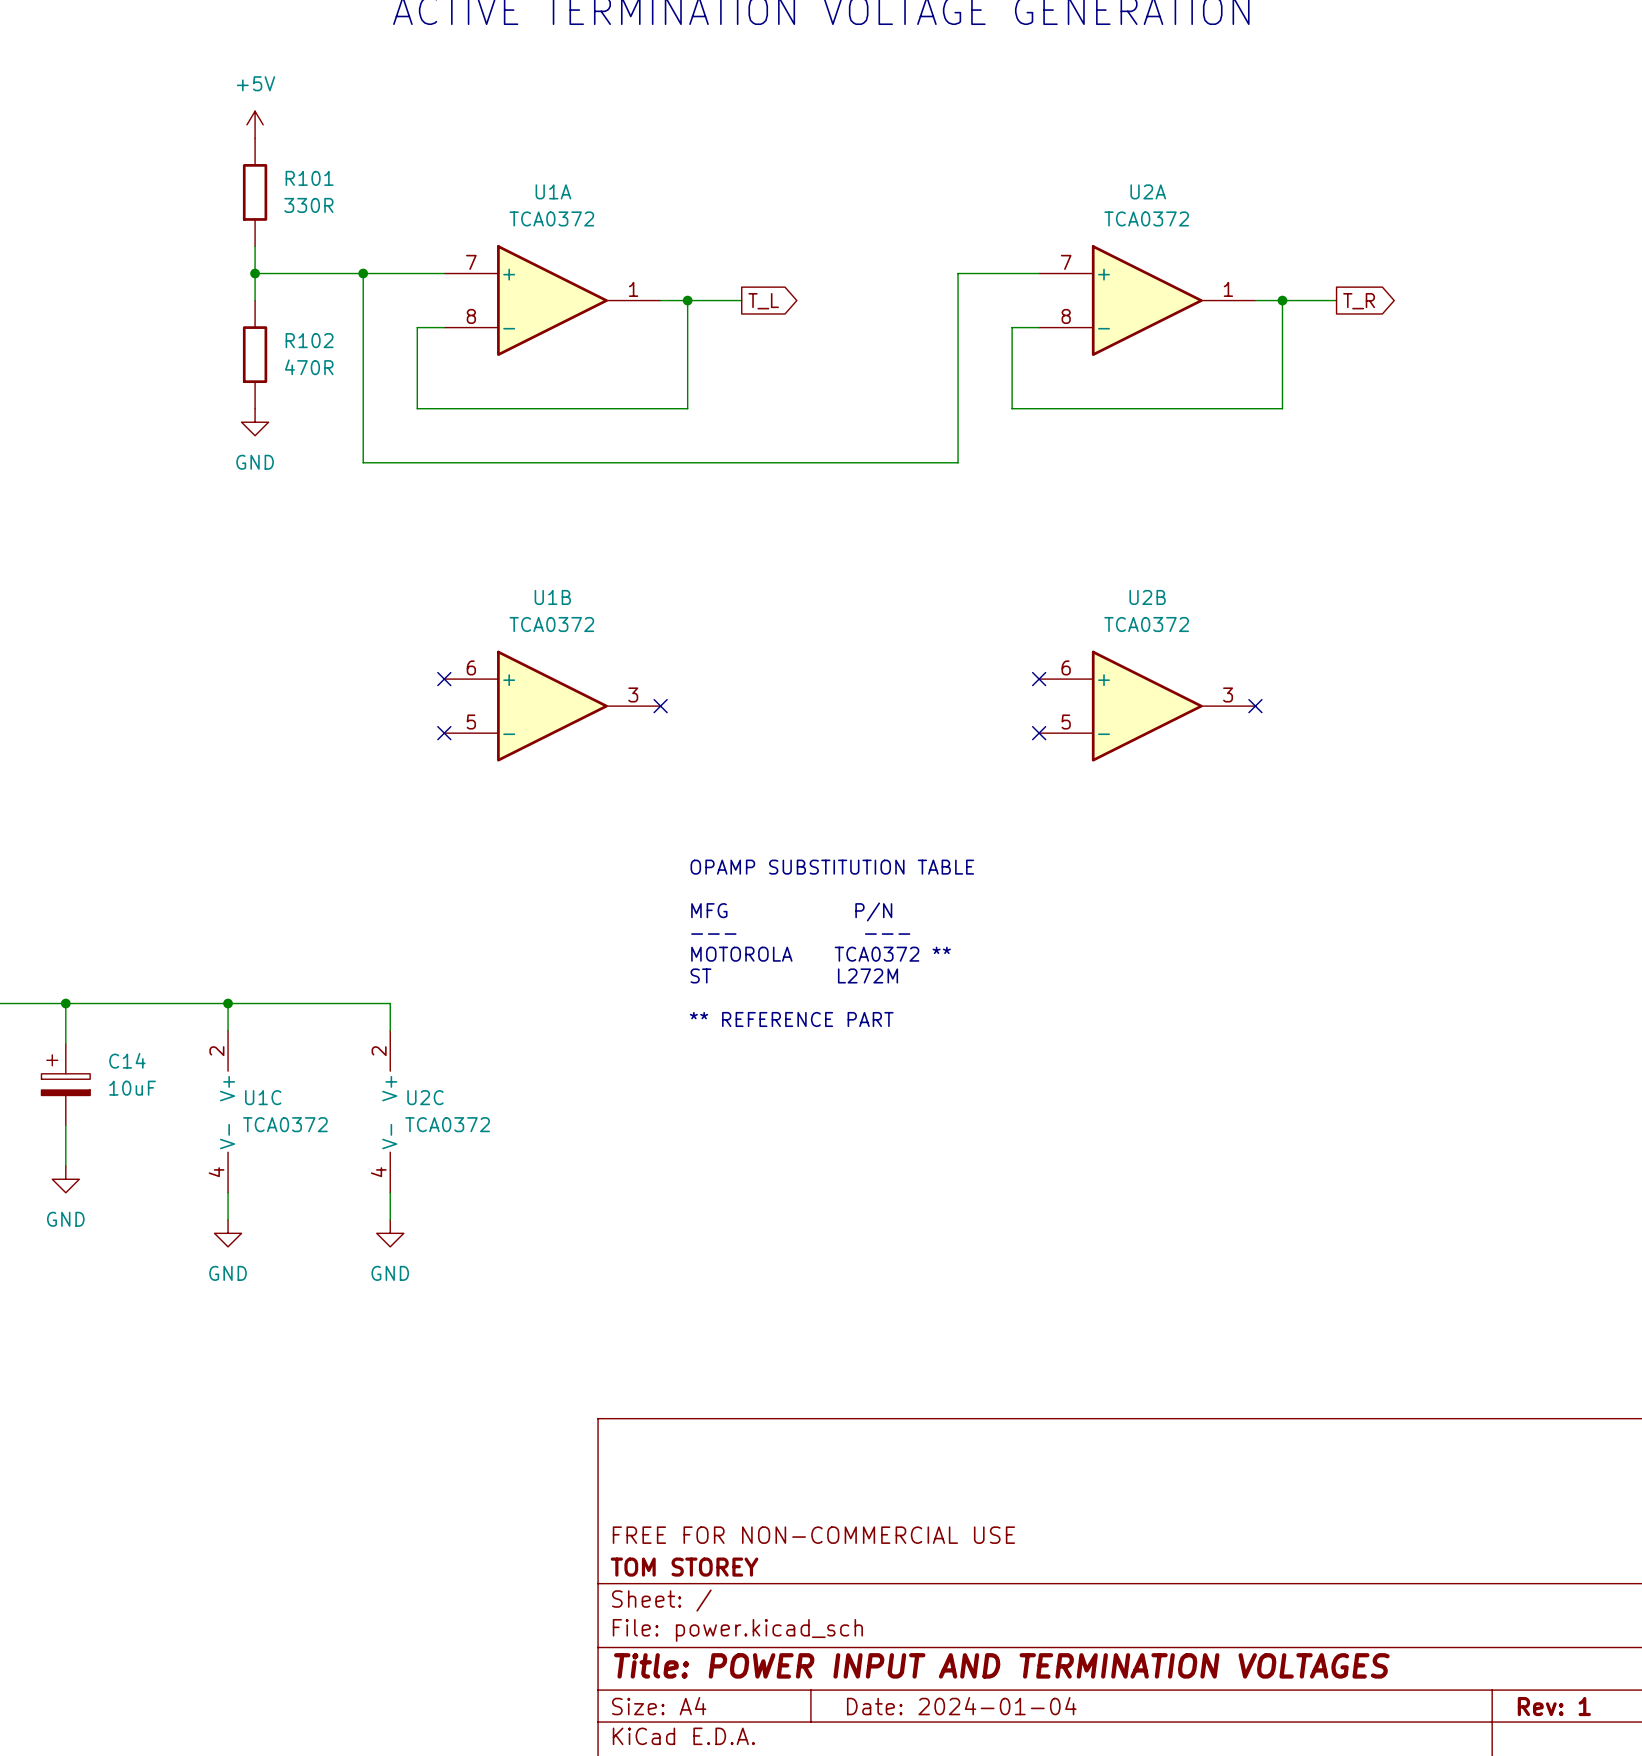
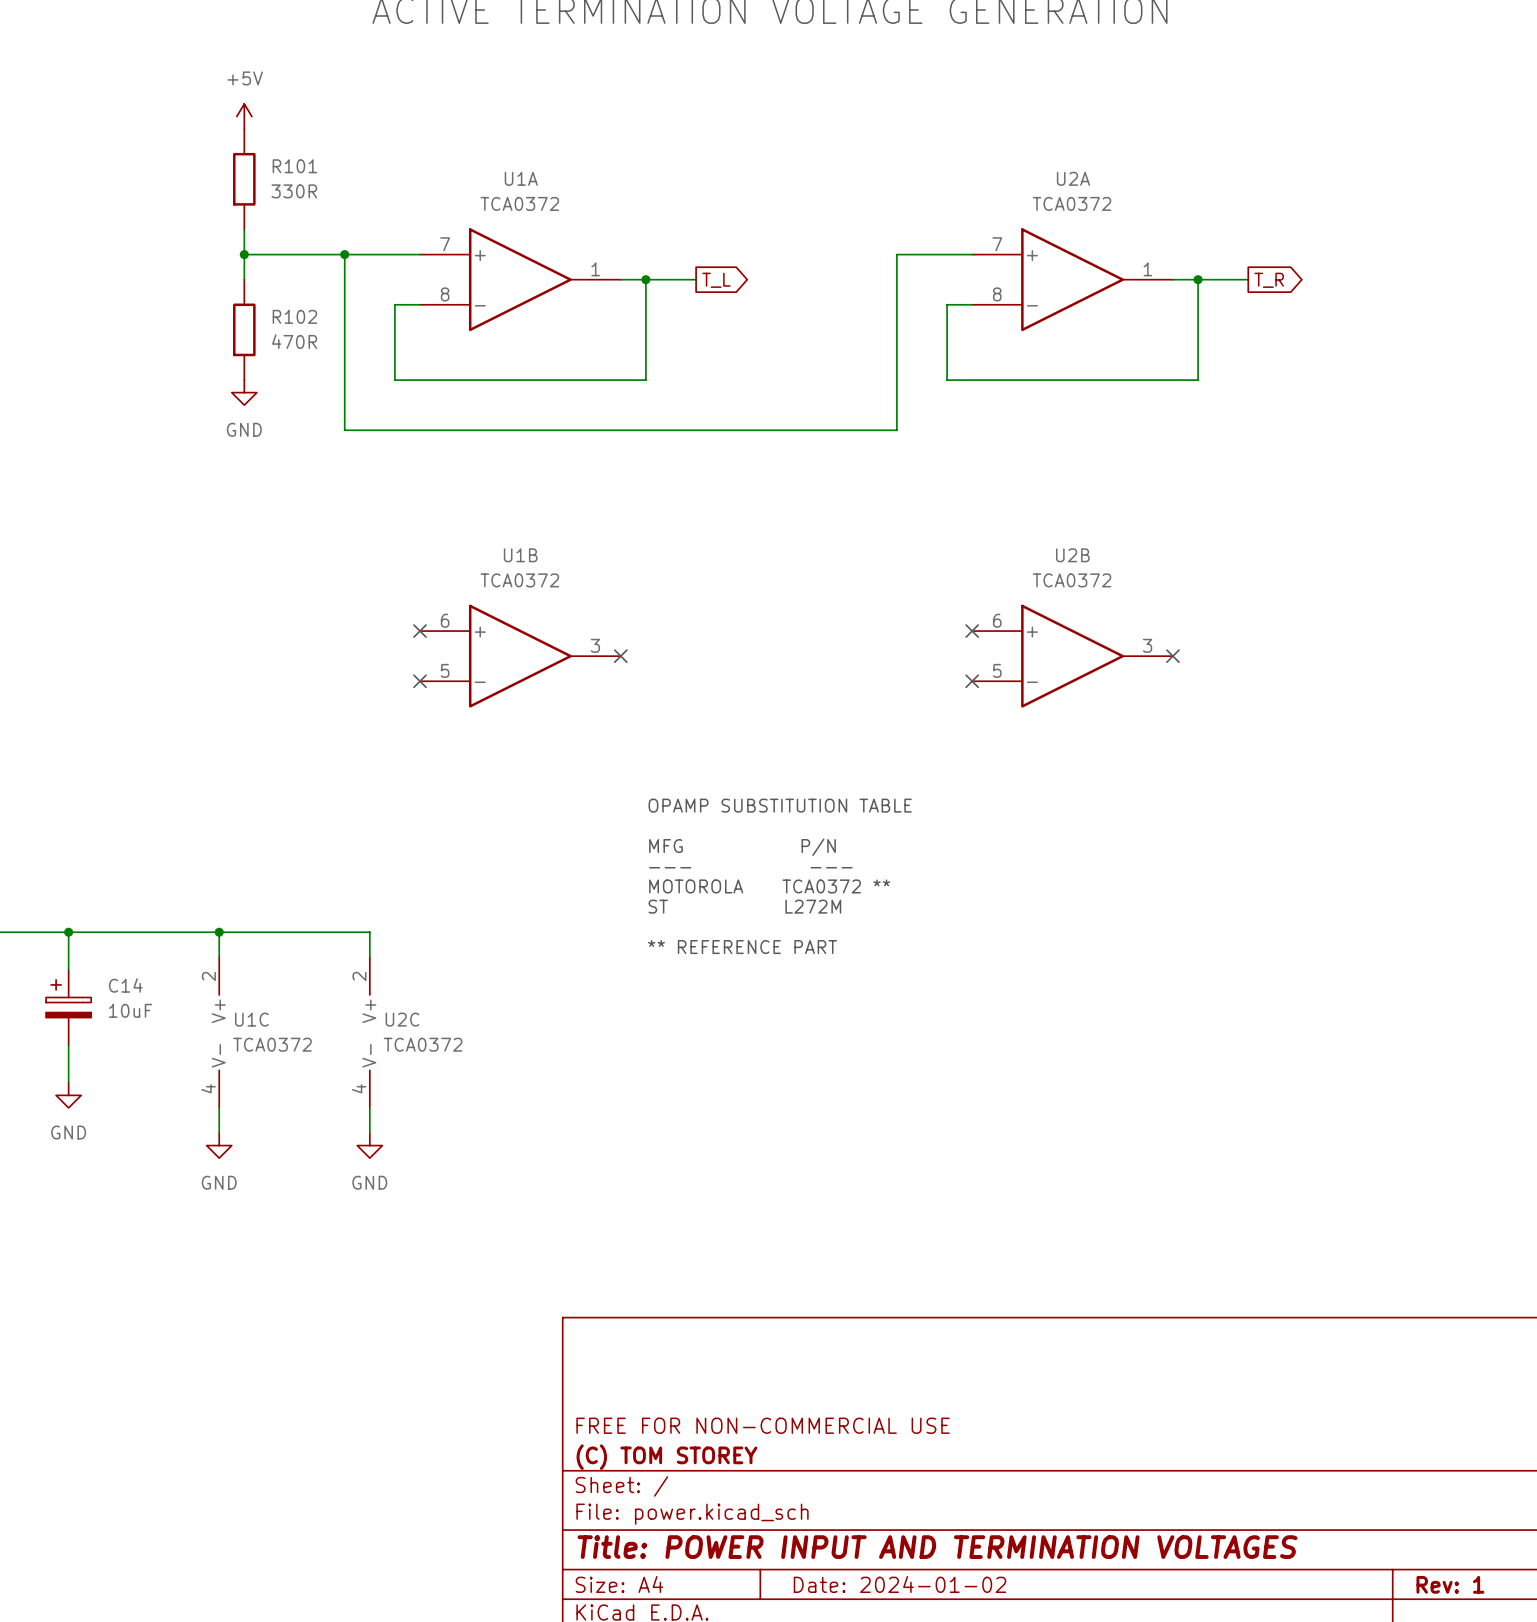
title block: TOM STOREY (684, 1567) -> (C) TOM STOREY (666, 1457)
title block: Date: 2024-01-04 (961, 1706) -> Date: 2024-01-02 (900, 1584)

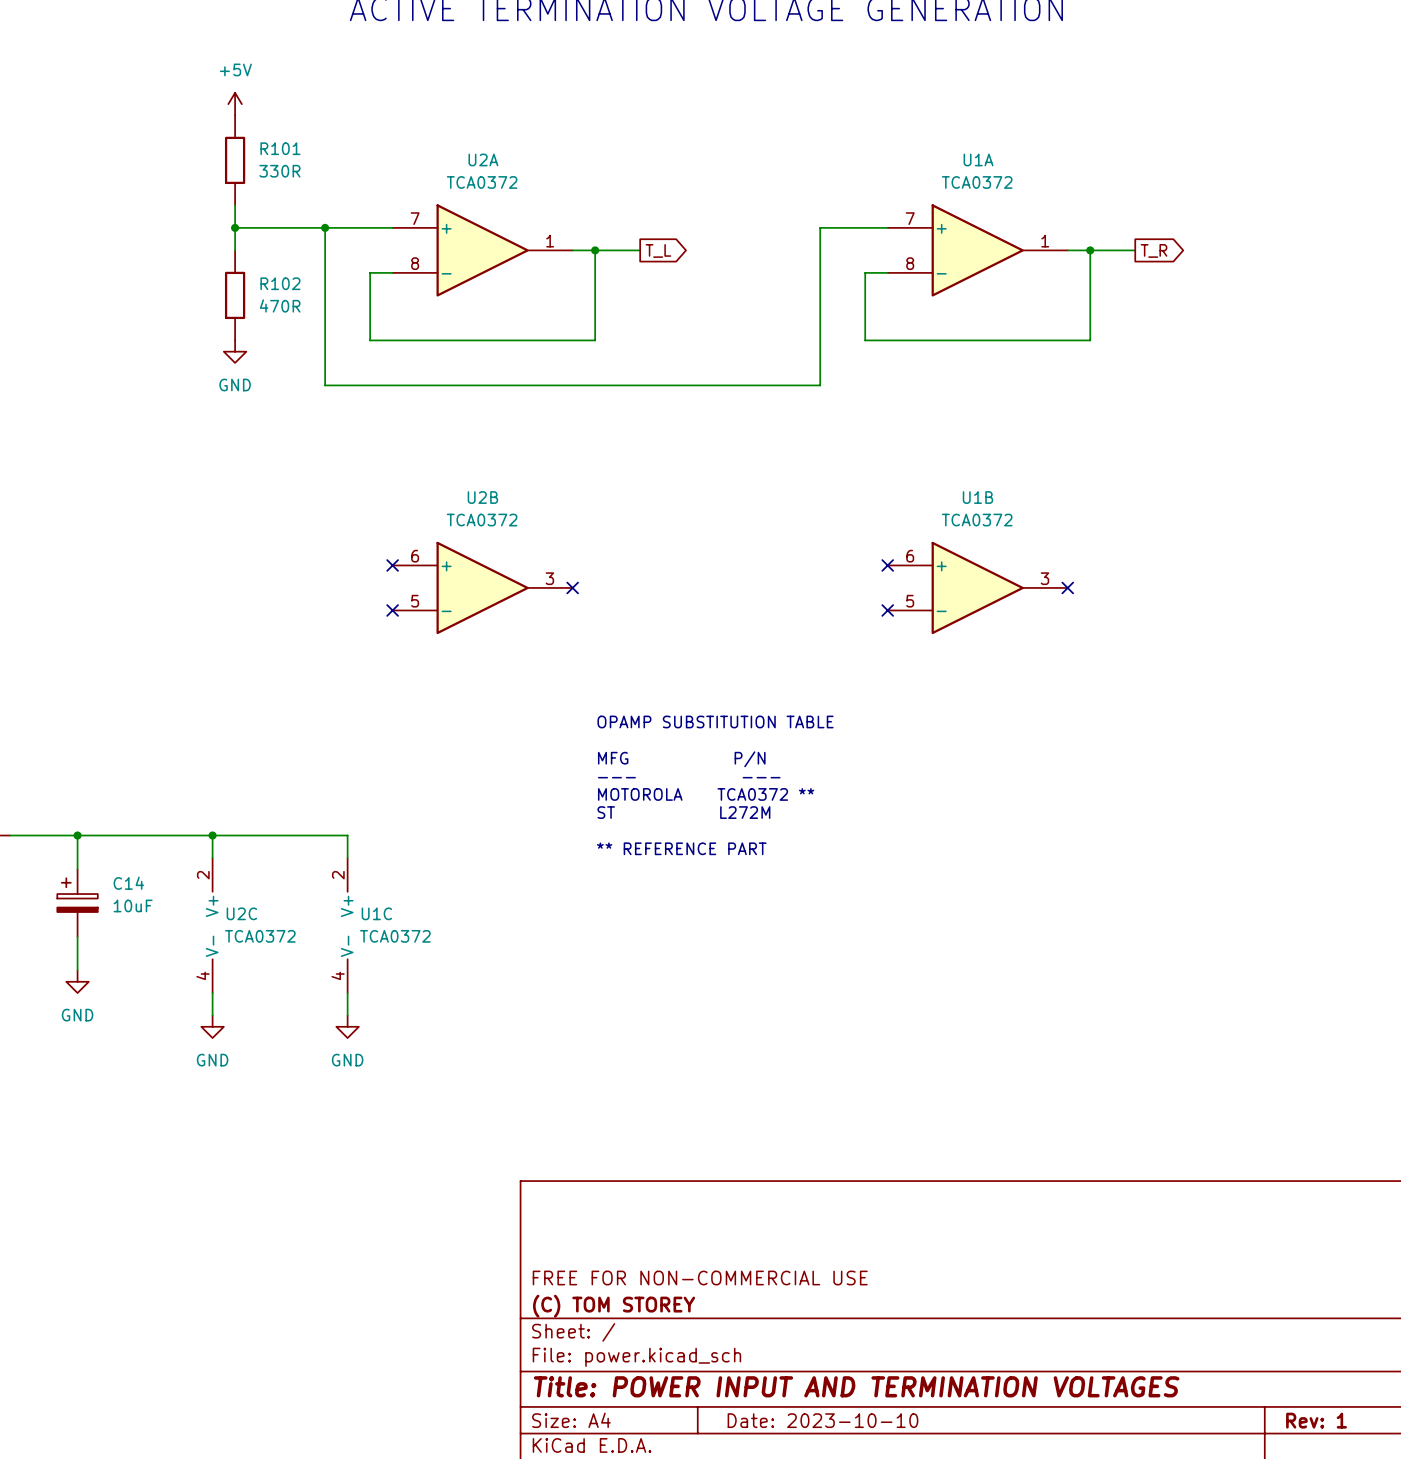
U1A name: U1A (521, 178) -> U2A (483, 159)
U2A name: U2A (1073, 178) -> U1A (978, 159)
U1B name: U1B (520, 555) -> U2B (482, 497)
U2B name: U2B (1072, 555) -> U1B (977, 497)
U1C name: U1C (251, 1019) -> U2C (241, 913)
U2C name: U2C (402, 1019) -> U1C (376, 913)
title block: Date: 2024-01-02 (900, 1584) -> Date: 2023-10-10 (822, 1420)

